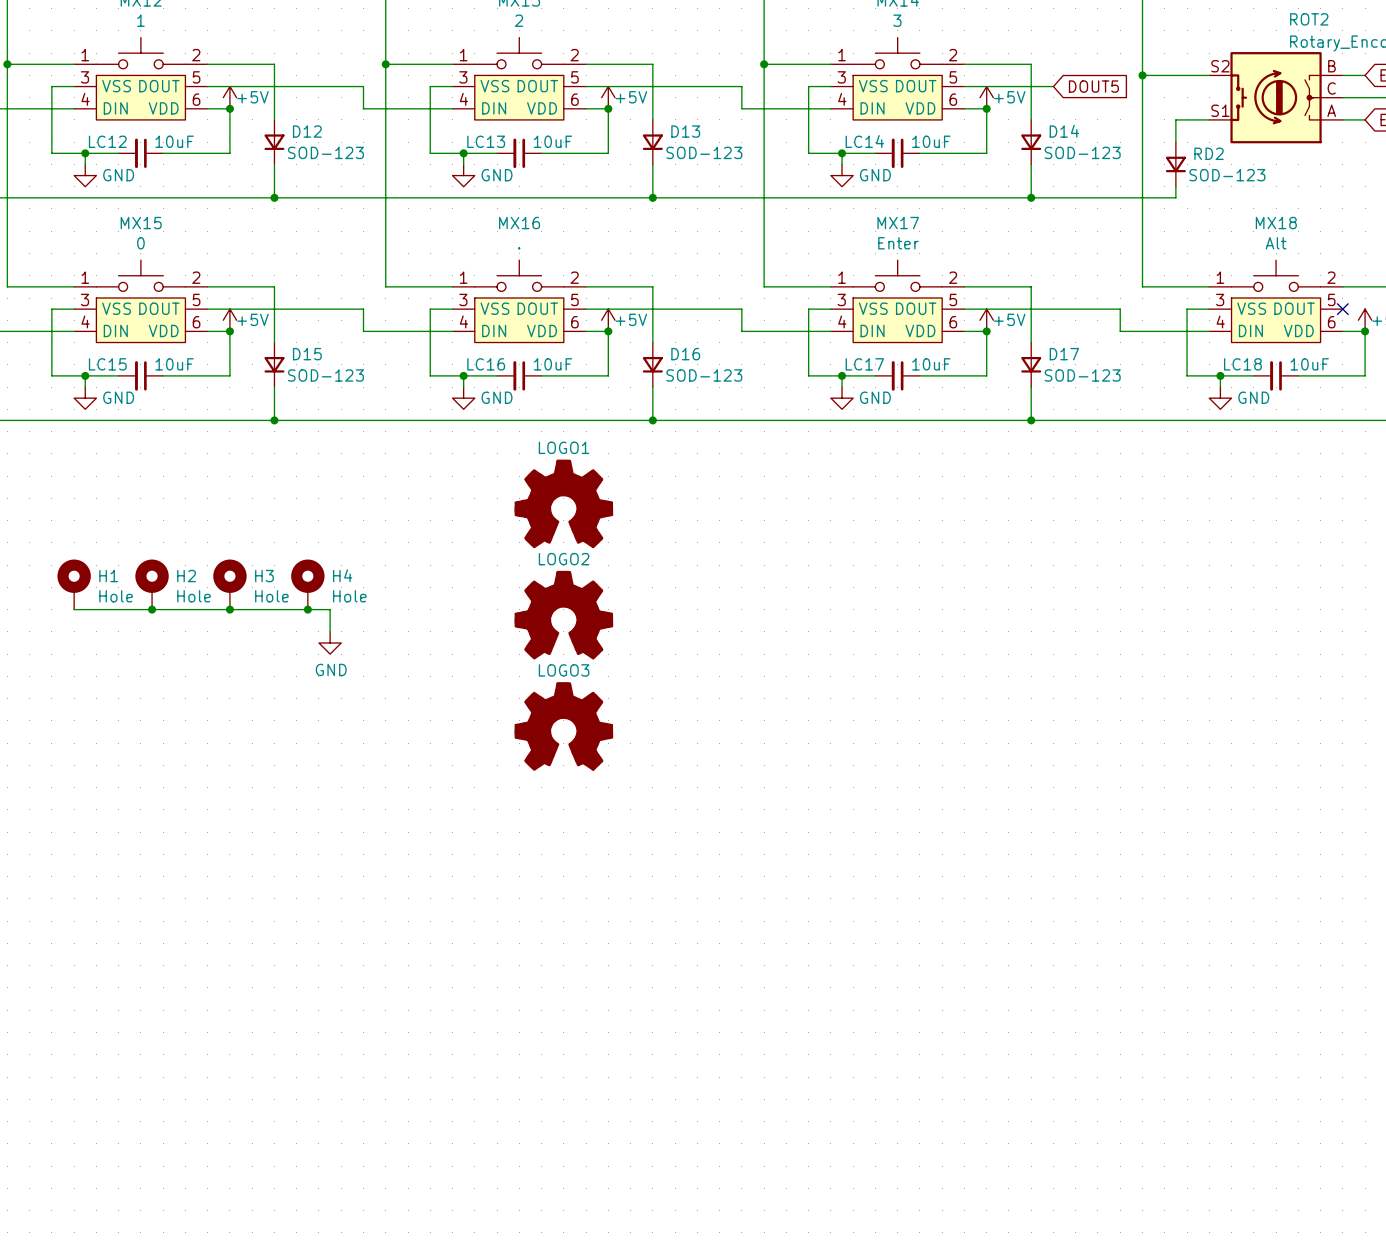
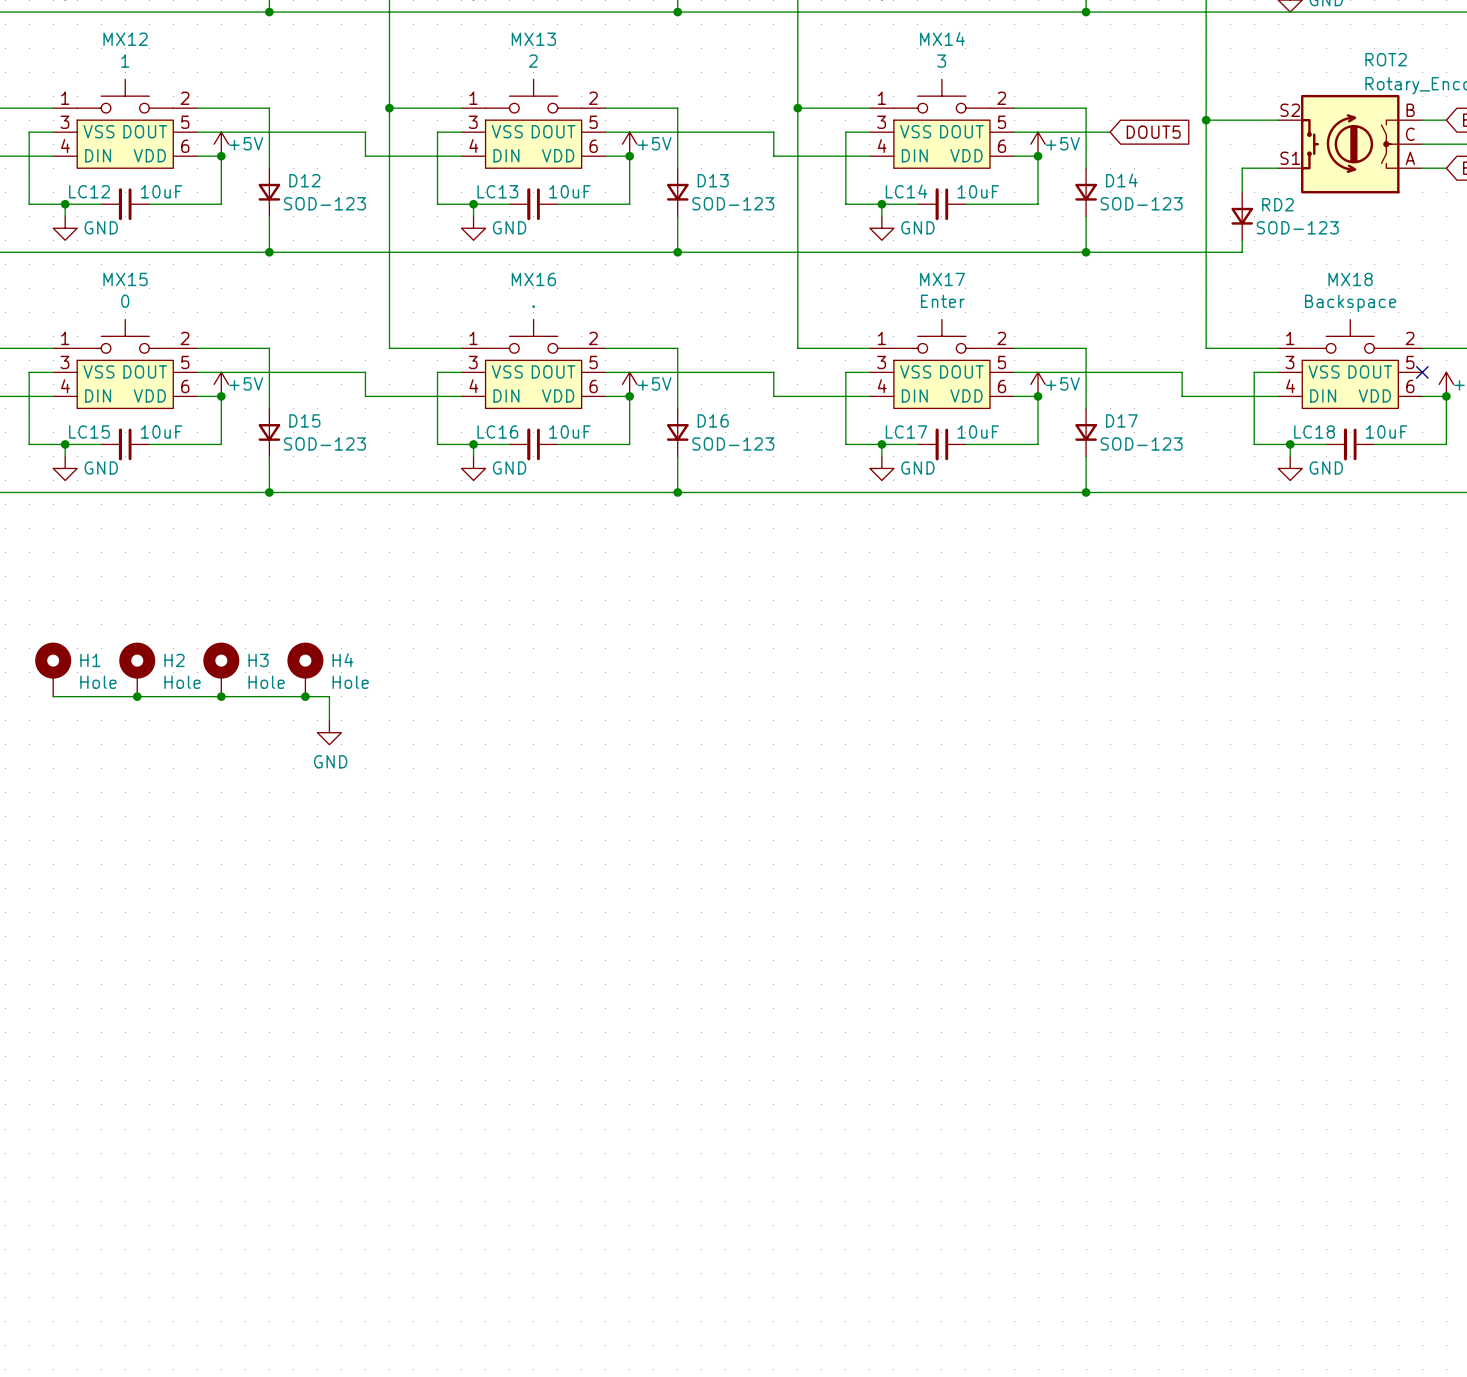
MX18 value: Alt (1276, 243) -> Backspace (1350, 303)
LOGO1: (563, 503) -> none
LOGO2: (563, 615) -> none
LOGO3: (563, 726) -> none

